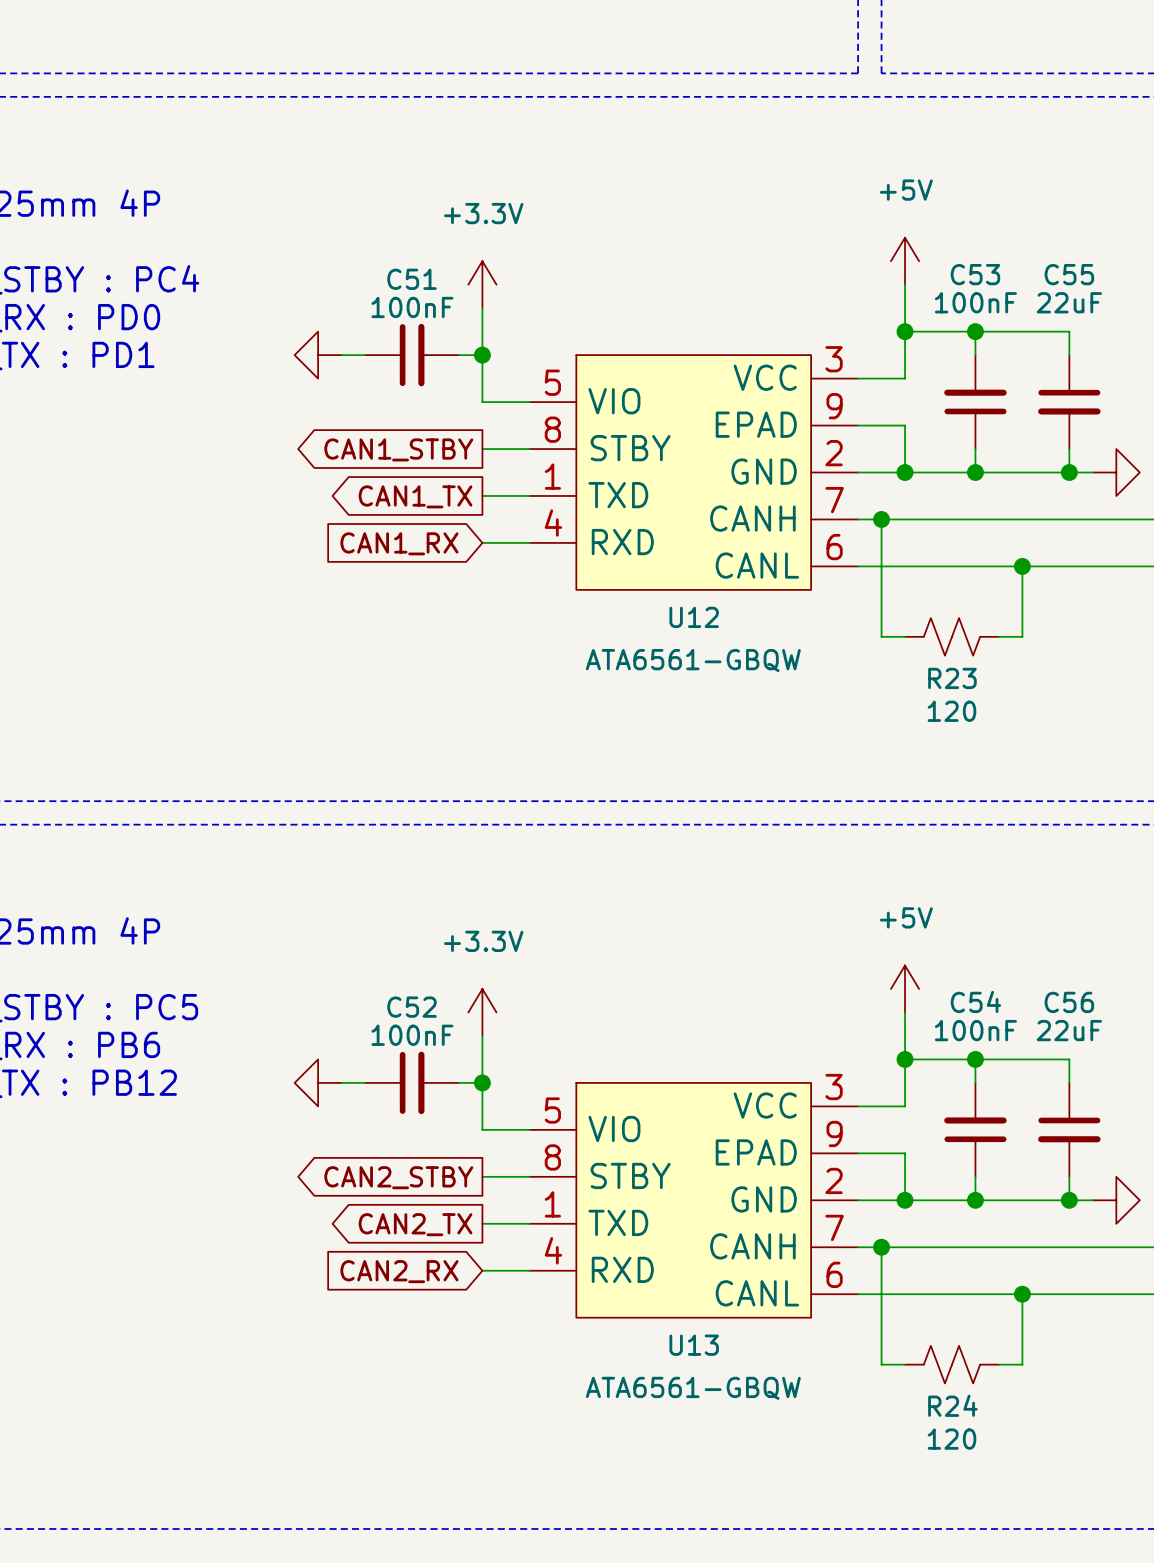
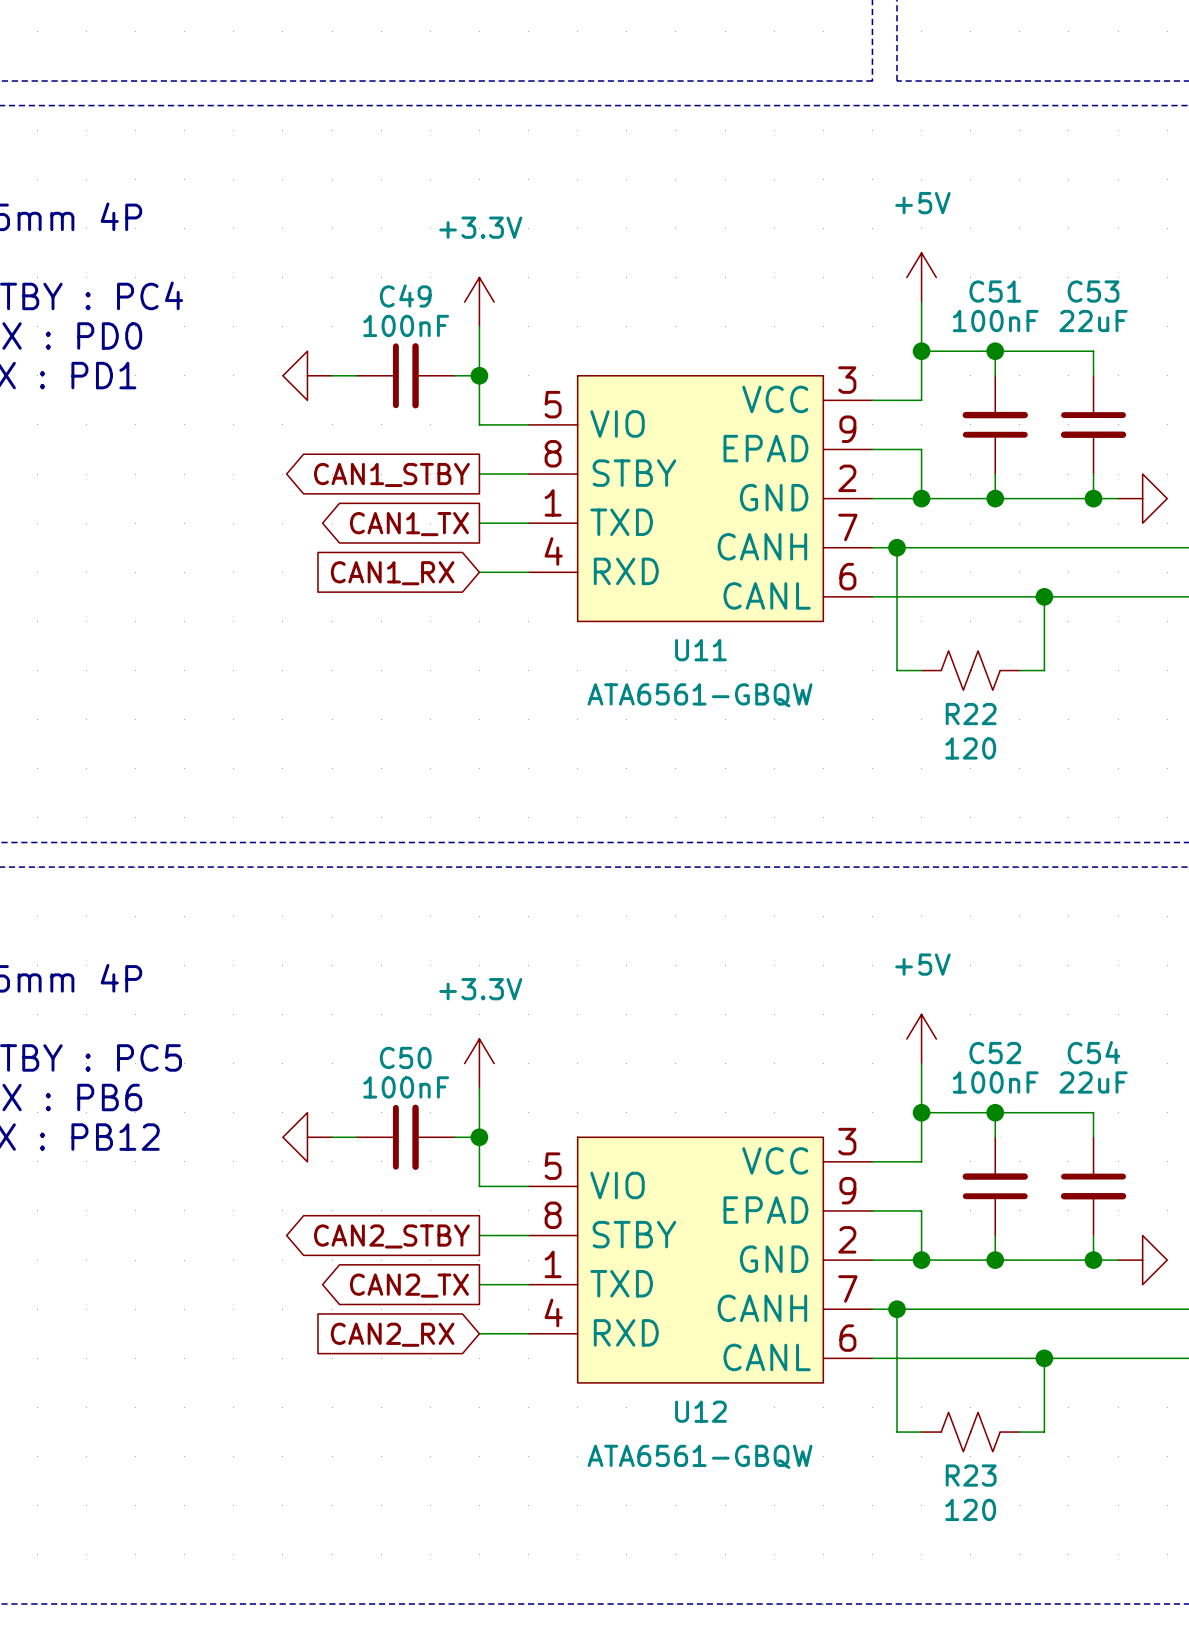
C53 name: C53 (975, 274) -> C51 (995, 291)
C55 name: C55 (1069, 274) -> C53 (1093, 291)
C51 name: C51 (412, 279) -> C49 (405, 295)
U12 name: U12 (694, 617) -> U11 (700, 650)
R23 name: R23 (952, 678) -> R22 (971, 714)
C54 name: C54 (975, 1001) -> C52 (995, 1053)
C56 name: C56 (1069, 1002) -> C54 (1093, 1052)
C52 name: C52 (412, 1007) -> C50 (405, 1057)
U13 name: U13 (694, 1345) -> U12 (700, 1411)
R24 name: R24 (952, 1405) -> R23 (971, 1475)

